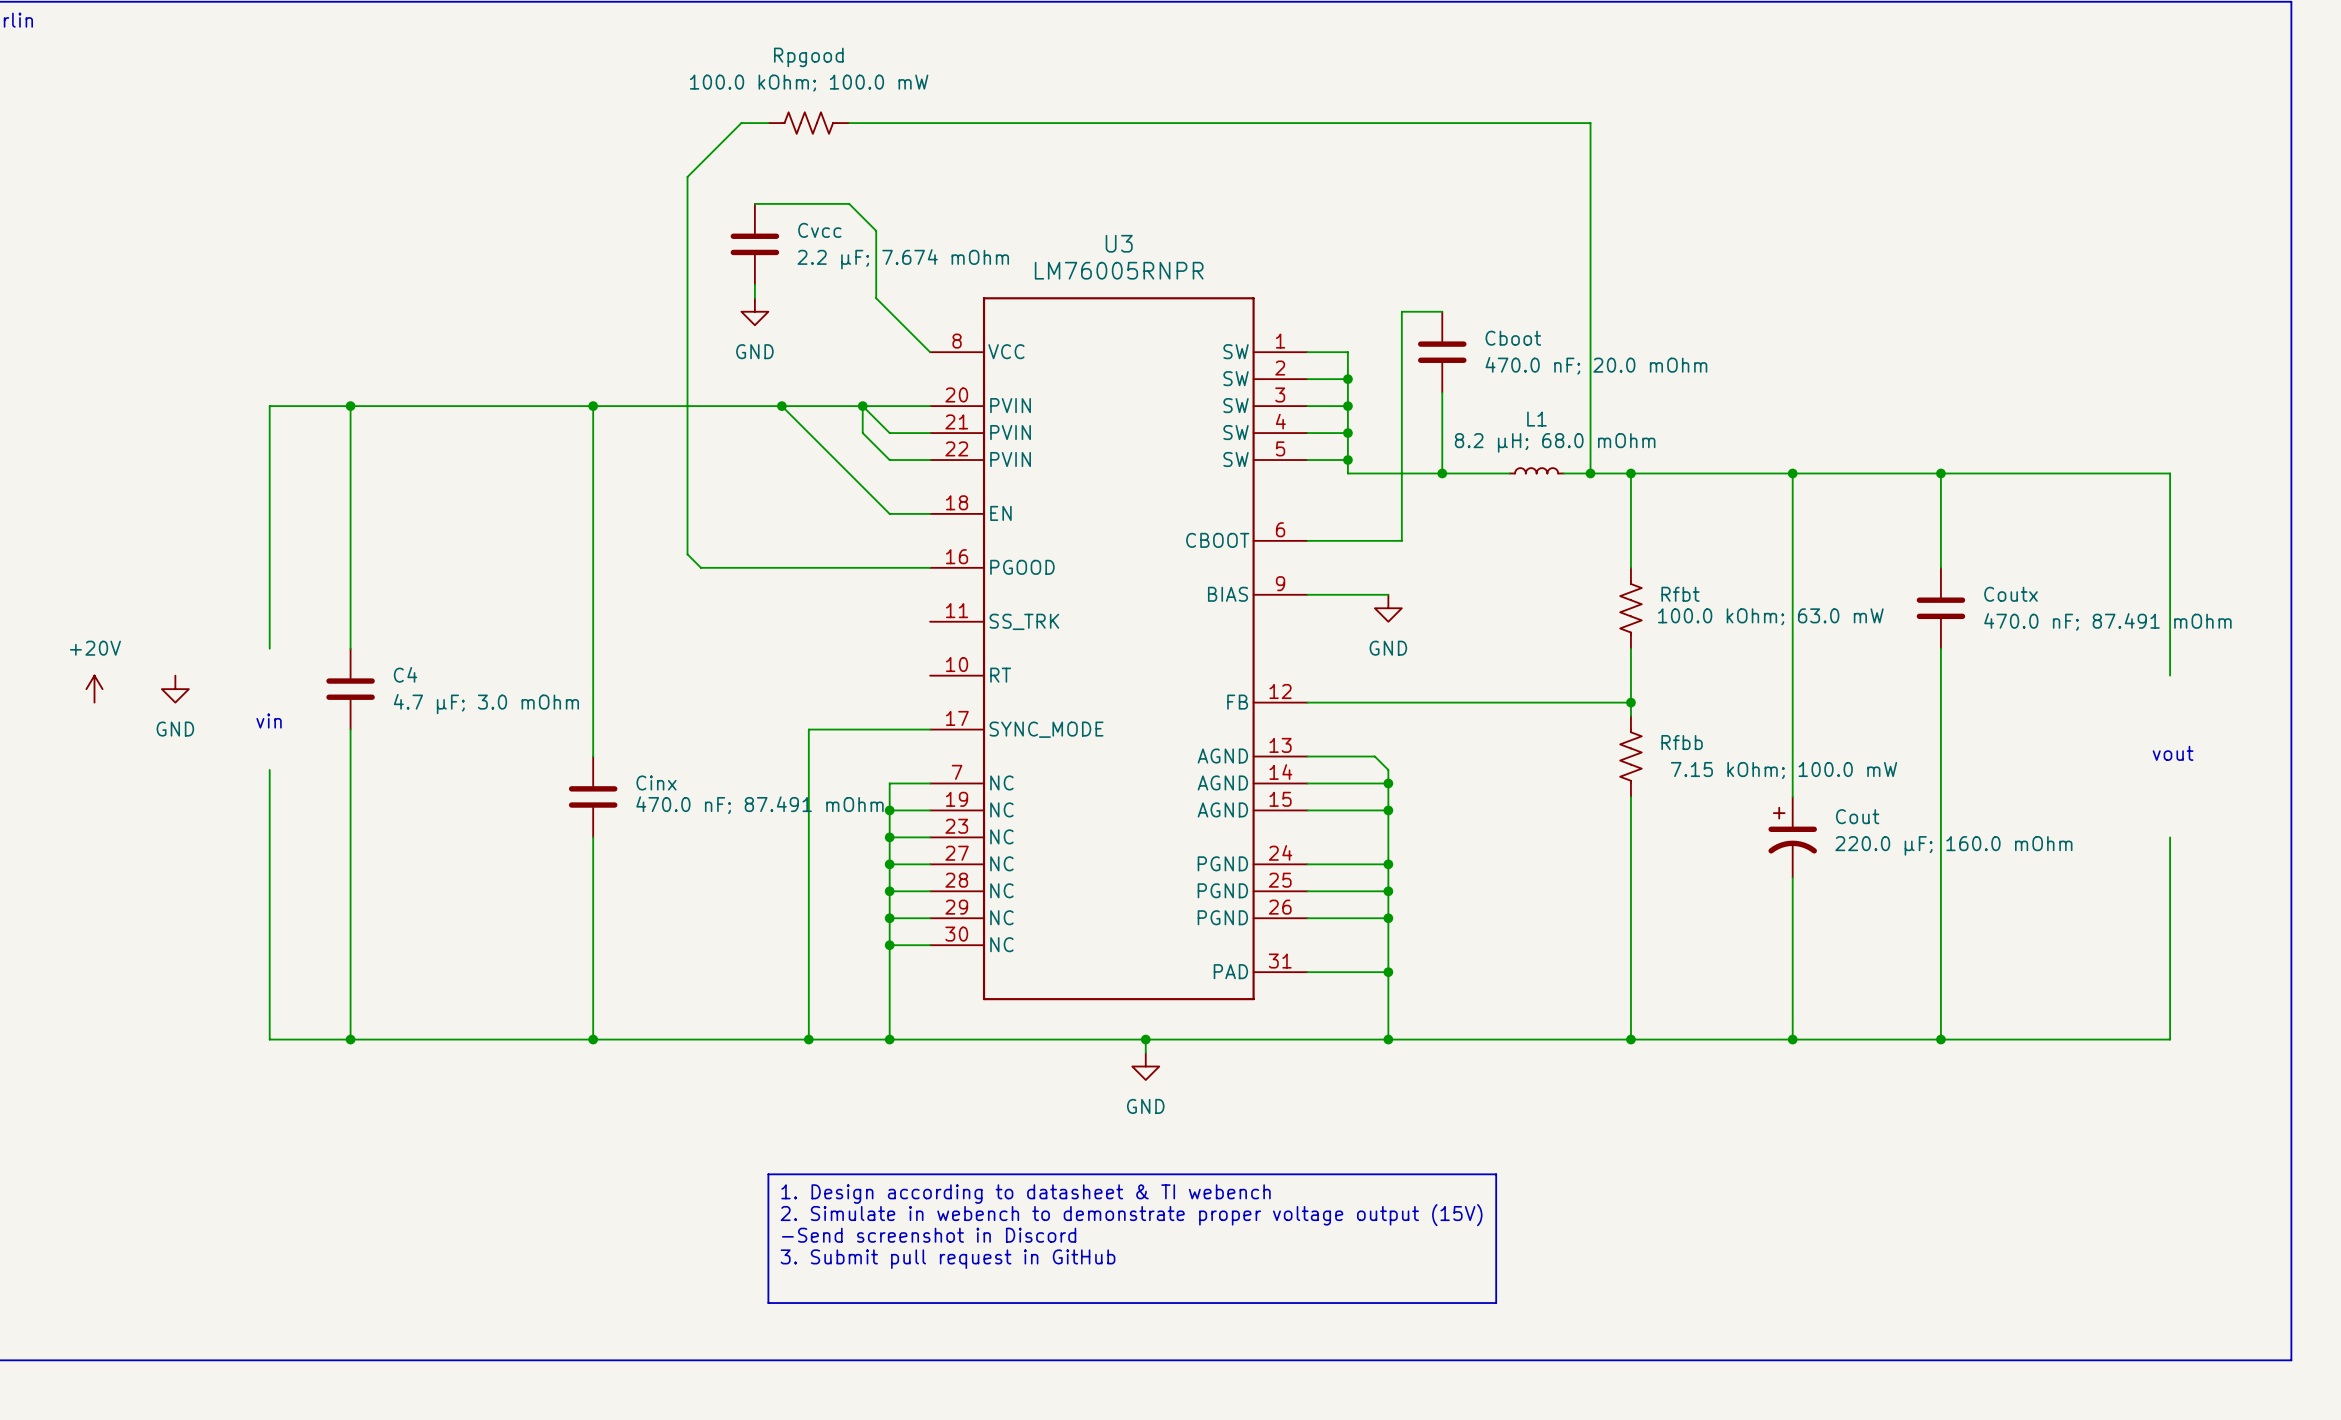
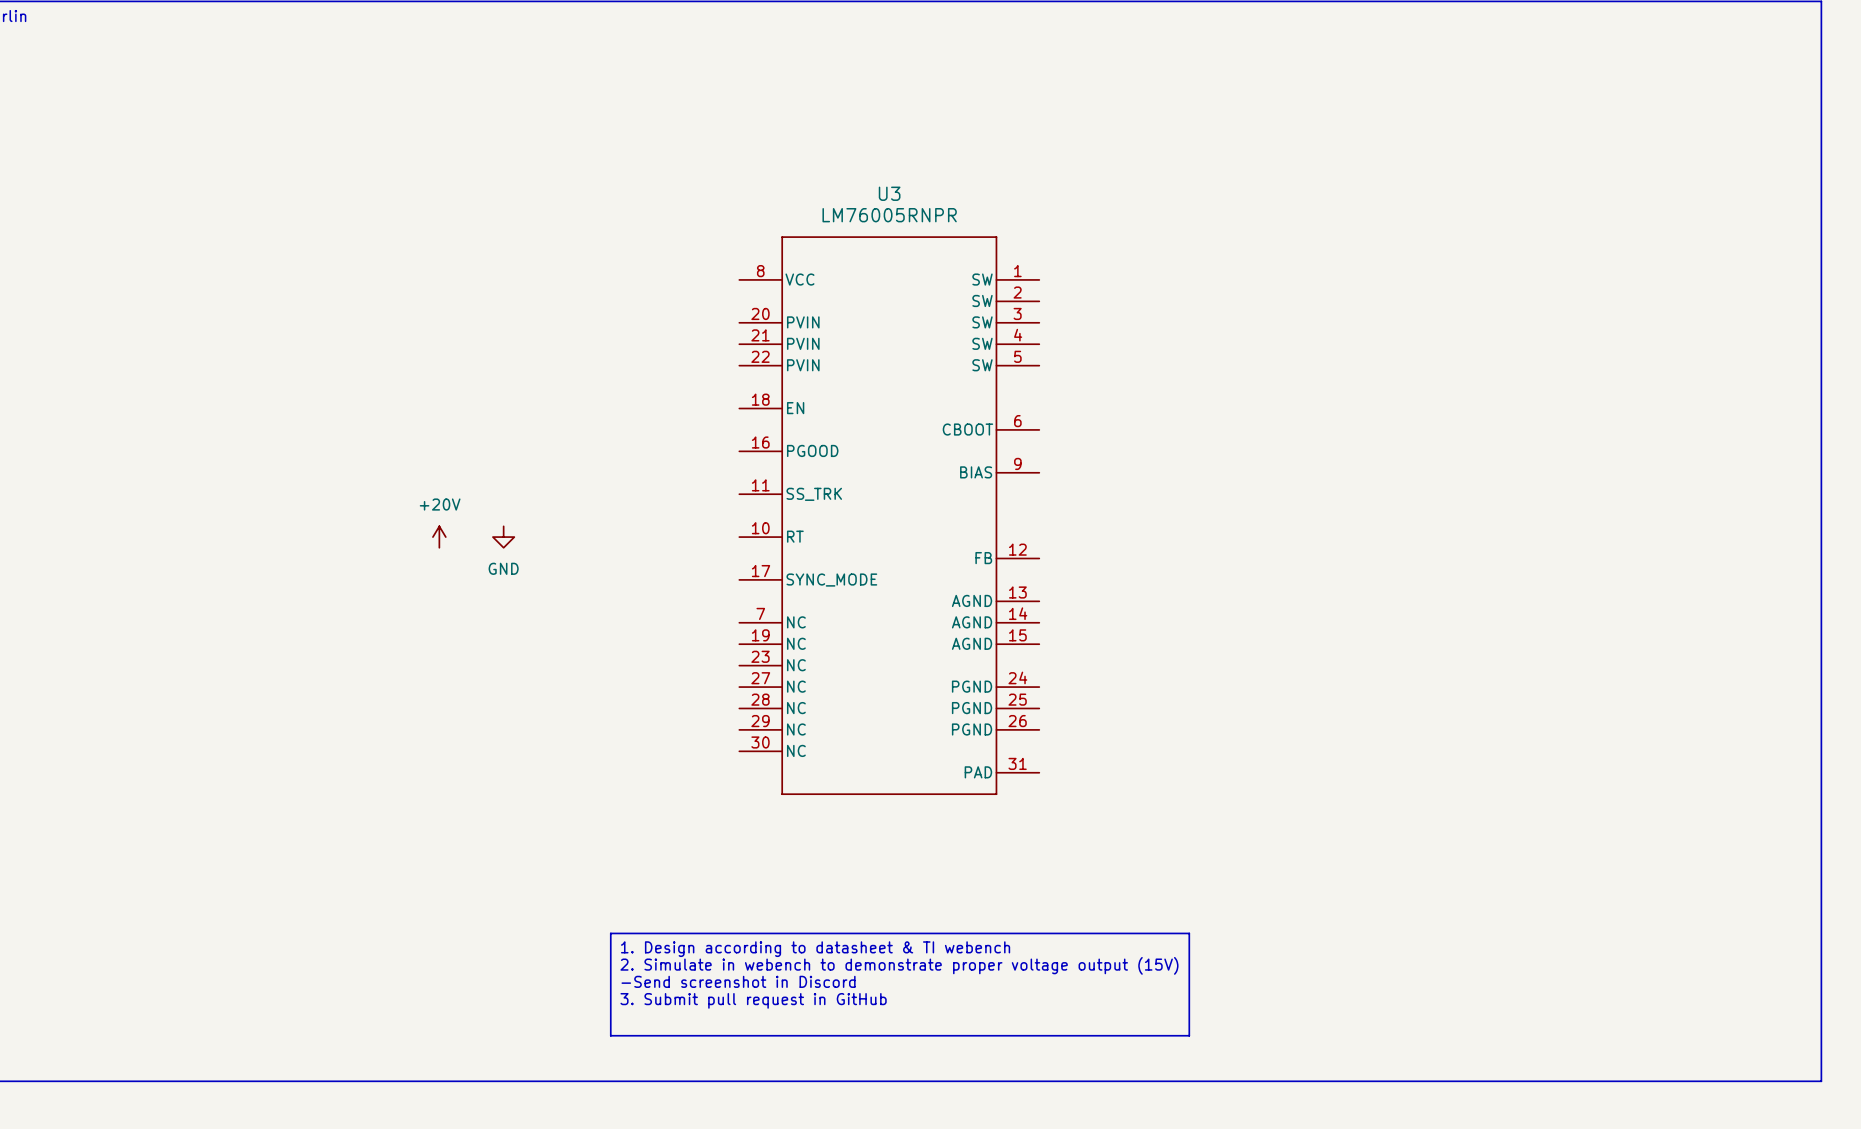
wire: (768, 123) (741, 123) (687, 176) (687, 554) (700, 567) (930, 567) -> none
Rpgood: 100.0 kOhm; 100.0 mW (808, 123) -> none
wire: (849, 123) (1590, 123) (1590, 473) -> none
wire: (754, 203) (849, 203) (876, 230) (876, 298) (930, 352) -> none
Cvcc: 2.2 μF; 7.674 mOhm (754, 244) -> none
wire: (754, 284) (754, 298) -> none
power symbol: GND (754, 311) -> none
wire: (1442, 311) (1401, 311) (1401, 540) (1307, 540) -> none
wire: (1307, 352) (1347, 352) (1347, 473) (1509, 473) -> none
Cboot: 470.0 nF; 20.0 mOhm (1442, 352) -> none
wire: (1307, 379) (1347, 379) -> none
junction: (1347, 379) -> none
wire: (1442, 392) (1442, 473) -> none
wire: (350, 406) (350, 648) -> none
junction: (350, 406) -> none
wire: (593, 406) (593, 756) -> none
junction: (593, 406) -> none
wire: (781, 406) (889, 513) (930, 513) -> none
junction: (781, 406) -> none
junction: (862, 406) -> none
wire: (930, 406) (269, 406) (269, 648) -> none
wire: (1307, 406) (1347, 406) -> none
junction: (1347, 406) -> none
wire: (930, 433) (889, 433) (862, 406) (862, 433) (889, 460) (930, 460) -> none
wire: (1307, 433) (1347, 433) -> none
junction: (1347, 433) -> none
wire: (1307, 460) (1347, 460) -> none
junction: (1347, 460) -> none
L1: 8.2 μH; 68.0 mOhm (1536, 470) -> none
junction: (1442, 473) -> none
wire: (1563, 473) (2170, 473) (2170, 675) -> none
junction: (1590, 473) -> none
wire: (1630, 473) (1630, 567) -> none
junction: (1630, 473) -> none
wire: (1792, 473) (1792, 796) -> none
junction: (1792, 473) -> none
wire: (1940, 473) (1940, 567) -> none
junction: (1940, 473) -> none
wire: (1307, 594) (1388, 594) -> none
power symbol: GND (1388, 608) -> none
Rfbt: 100.0 kOhm; 63.0 mW (1630, 608) -> none
Coutx: 470.0 nF; 87.491 mOhm (1940, 608) -> none
wire: (1630, 648) (1630, 716) -> none
wire: (1940, 648) (1940, 1039) -> none
power symbol: none -> +20V (439, 537)
power symbol: none -> GND (503, 537)
power symbol: +20V (94, 689) -> none
power symbol: GND (175, 689) -> none
C4: 4.7 µF; 3.0 mOhm (350, 689) -> none
wire: (1307, 702) (1630, 702) -> none
junction: (1630, 702) -> none
text: vin (269, 721) -> none
wire: (350, 729) (350, 1039) -> none
wire: (930, 729) (808, 729) (808, 1039) -> none
text: vout (2173, 753) -> none
wire: (1307, 756) (1374, 756) (1388, 770) (1388, 1039) -> none
Rfbb: 7.15 kOhm; 100.0 mW (1630, 756) -> none
wire: (269, 770) (269, 1039) (2170, 1039) (2170, 837) -> none
wire: (930, 783) (889, 783) (889, 1039) -> none
wire: (1307, 783) (1388, 783) -> none
junction: (1388, 783) -> none
Cinx: 470.0 nF; 87.491 mOhm (593, 796) -> none
wire: (1630, 796) (1630, 1039) -> none
wire: (889, 810) (930, 810) -> none
junction: (889, 810) -> none
wire: (1307, 810) (1388, 810) -> none
junction: (1388, 810) -> none
wire: (593, 837) (593, 1039) -> none
wire: (889, 837) (930, 837) -> none
junction: (889, 837) -> none
Cout: 220.0 μF; 160.0 mOhm (1792, 837) -> none
wire: (889, 864) (930, 864) -> none
junction: (889, 864) -> none
wire: (1307, 864) (1388, 864) -> none
junction: (1388, 864) -> none
wire: (1792, 877) (1792, 1039) -> none
wire: (889, 891) (930, 891) -> none
junction: (889, 891) -> none
wire: (1307, 891) (1388, 891) -> none
junction: (1388, 891) -> none
wire: (889, 918) (930, 918) -> none
junction: (889, 918) -> none
wire: (1307, 918) (1388, 918) -> none
junction: (1388, 918) -> none
wire: (889, 945) (930, 945) -> none
junction: (889, 945) -> none
wire: (1307, 972) (1388, 972) -> none
junction: (1388, 972) -> none
junction: (350, 1039) -> none
junction: (593, 1039) -> none
junction: (808, 1039) -> none
junction: (889, 1039) -> none
wire: (1145, 1039) (1145, 1053) -> none
junction: (1145, 1039) -> none
junction: (1388, 1039) -> none
junction: (1630, 1039) -> none
junction: (1792, 1039) -> none
junction: (1940, 1039) -> none
power symbol: GND (1145, 1066) -> none

